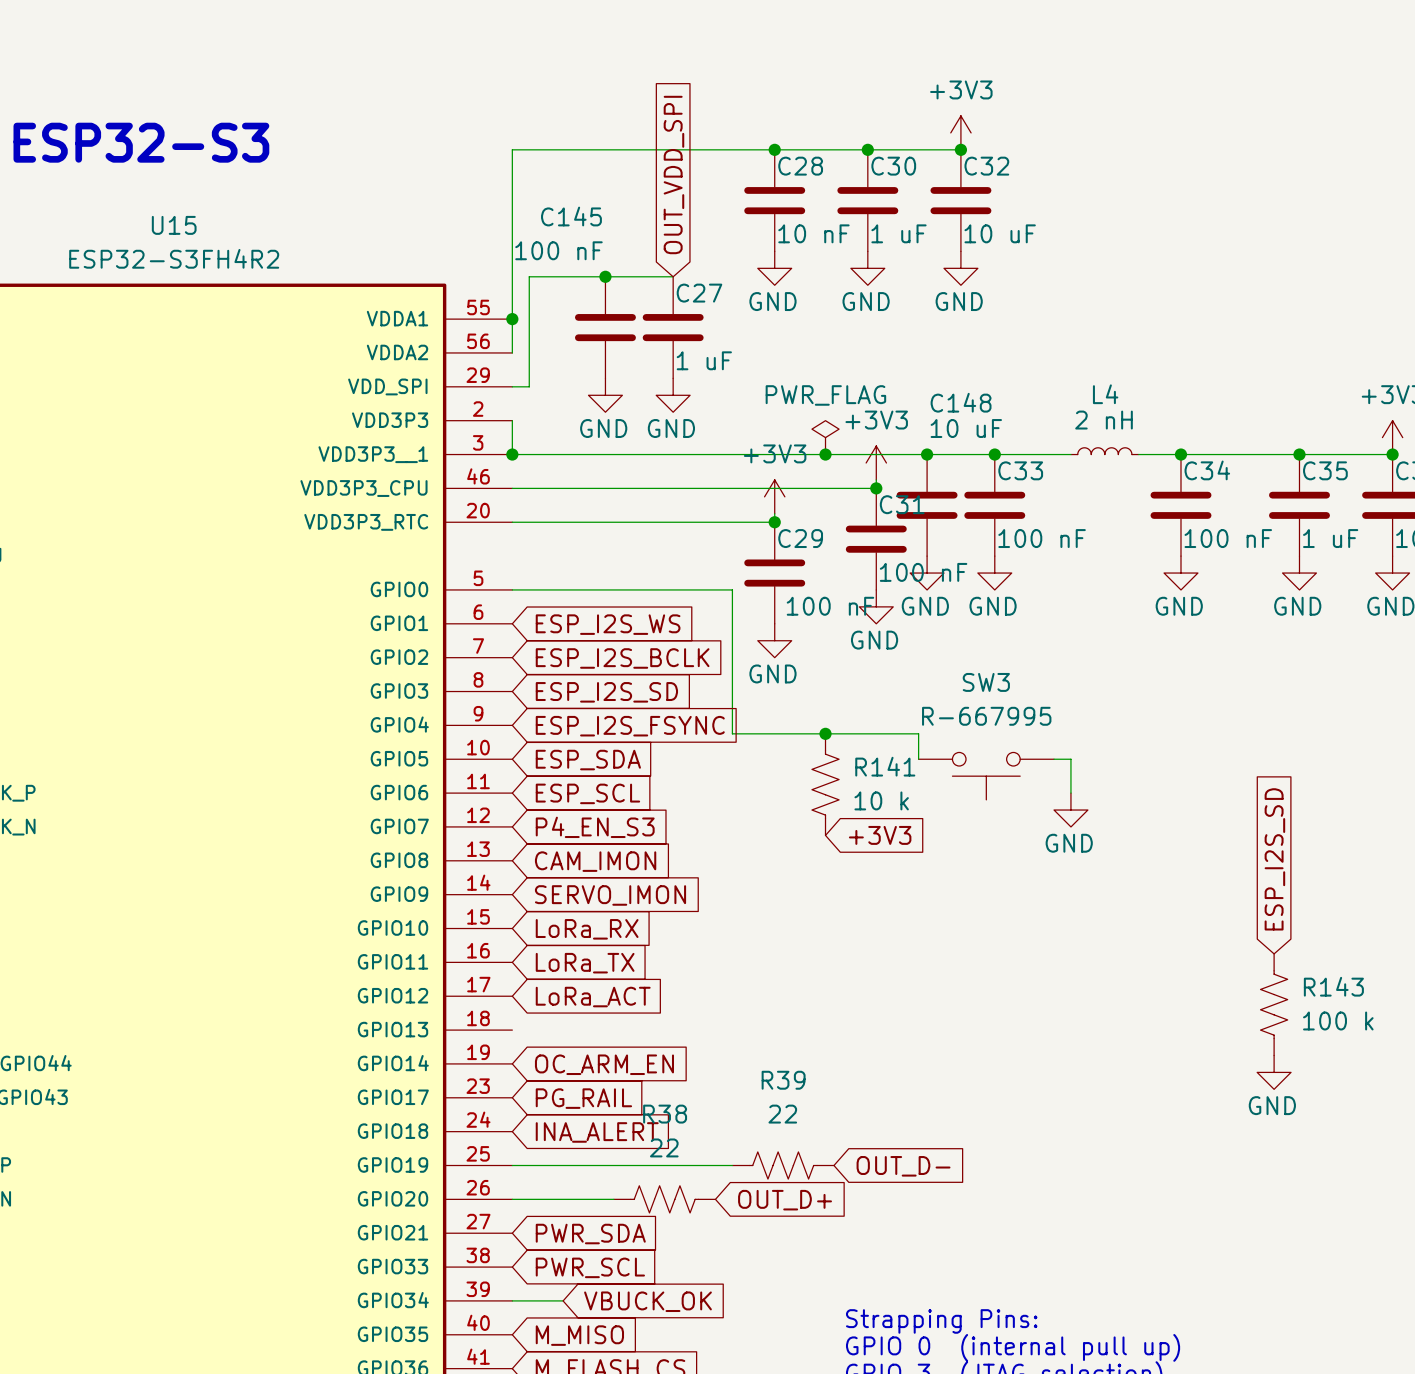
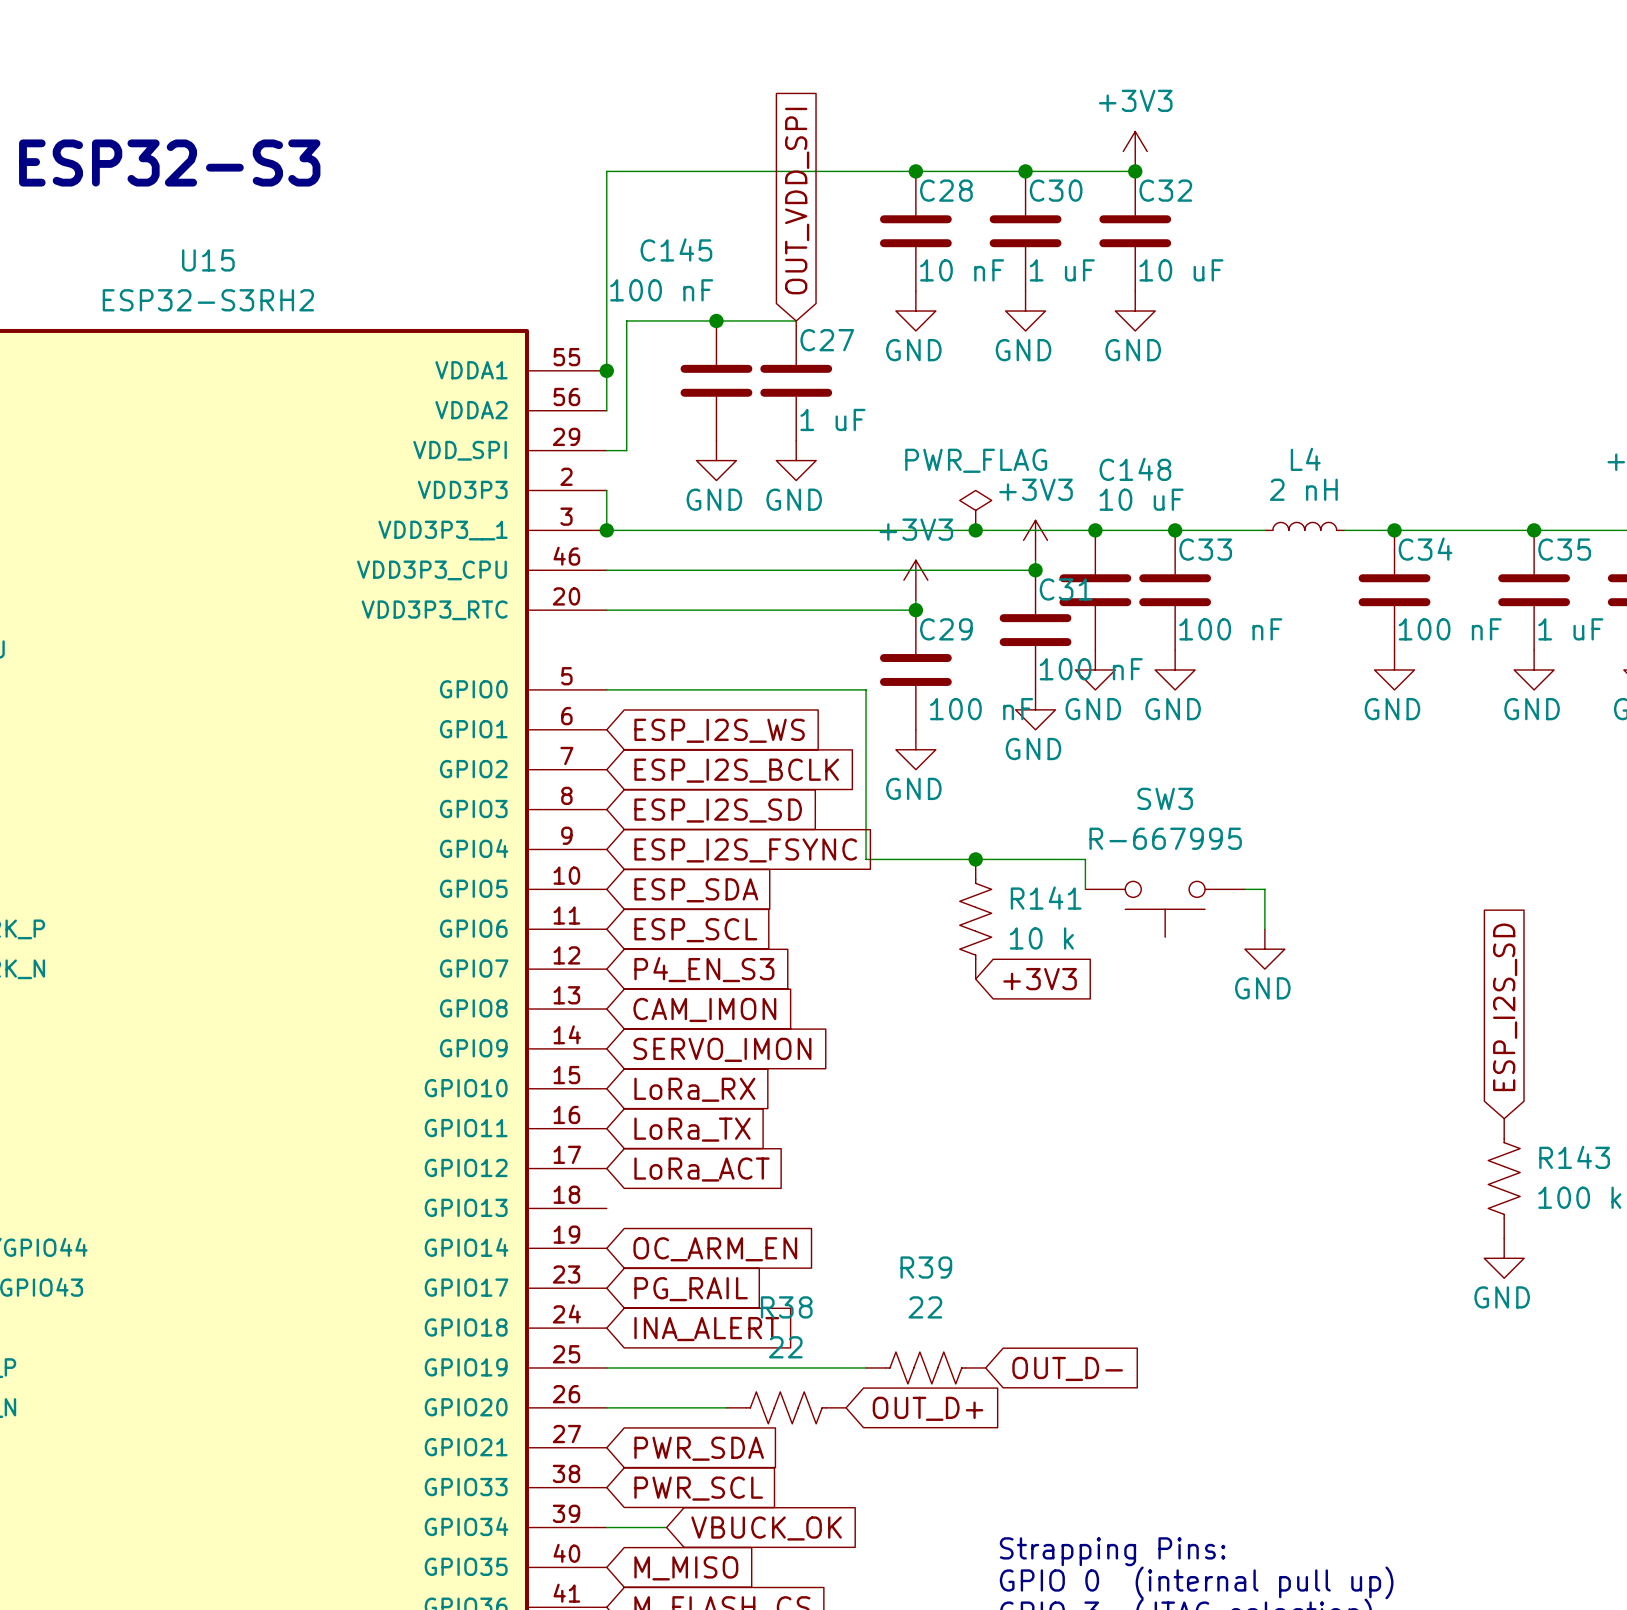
U15 value: ESP32-S3FH4R2 (174, 258) -> ESP32-S3RH2 (208, 300)

